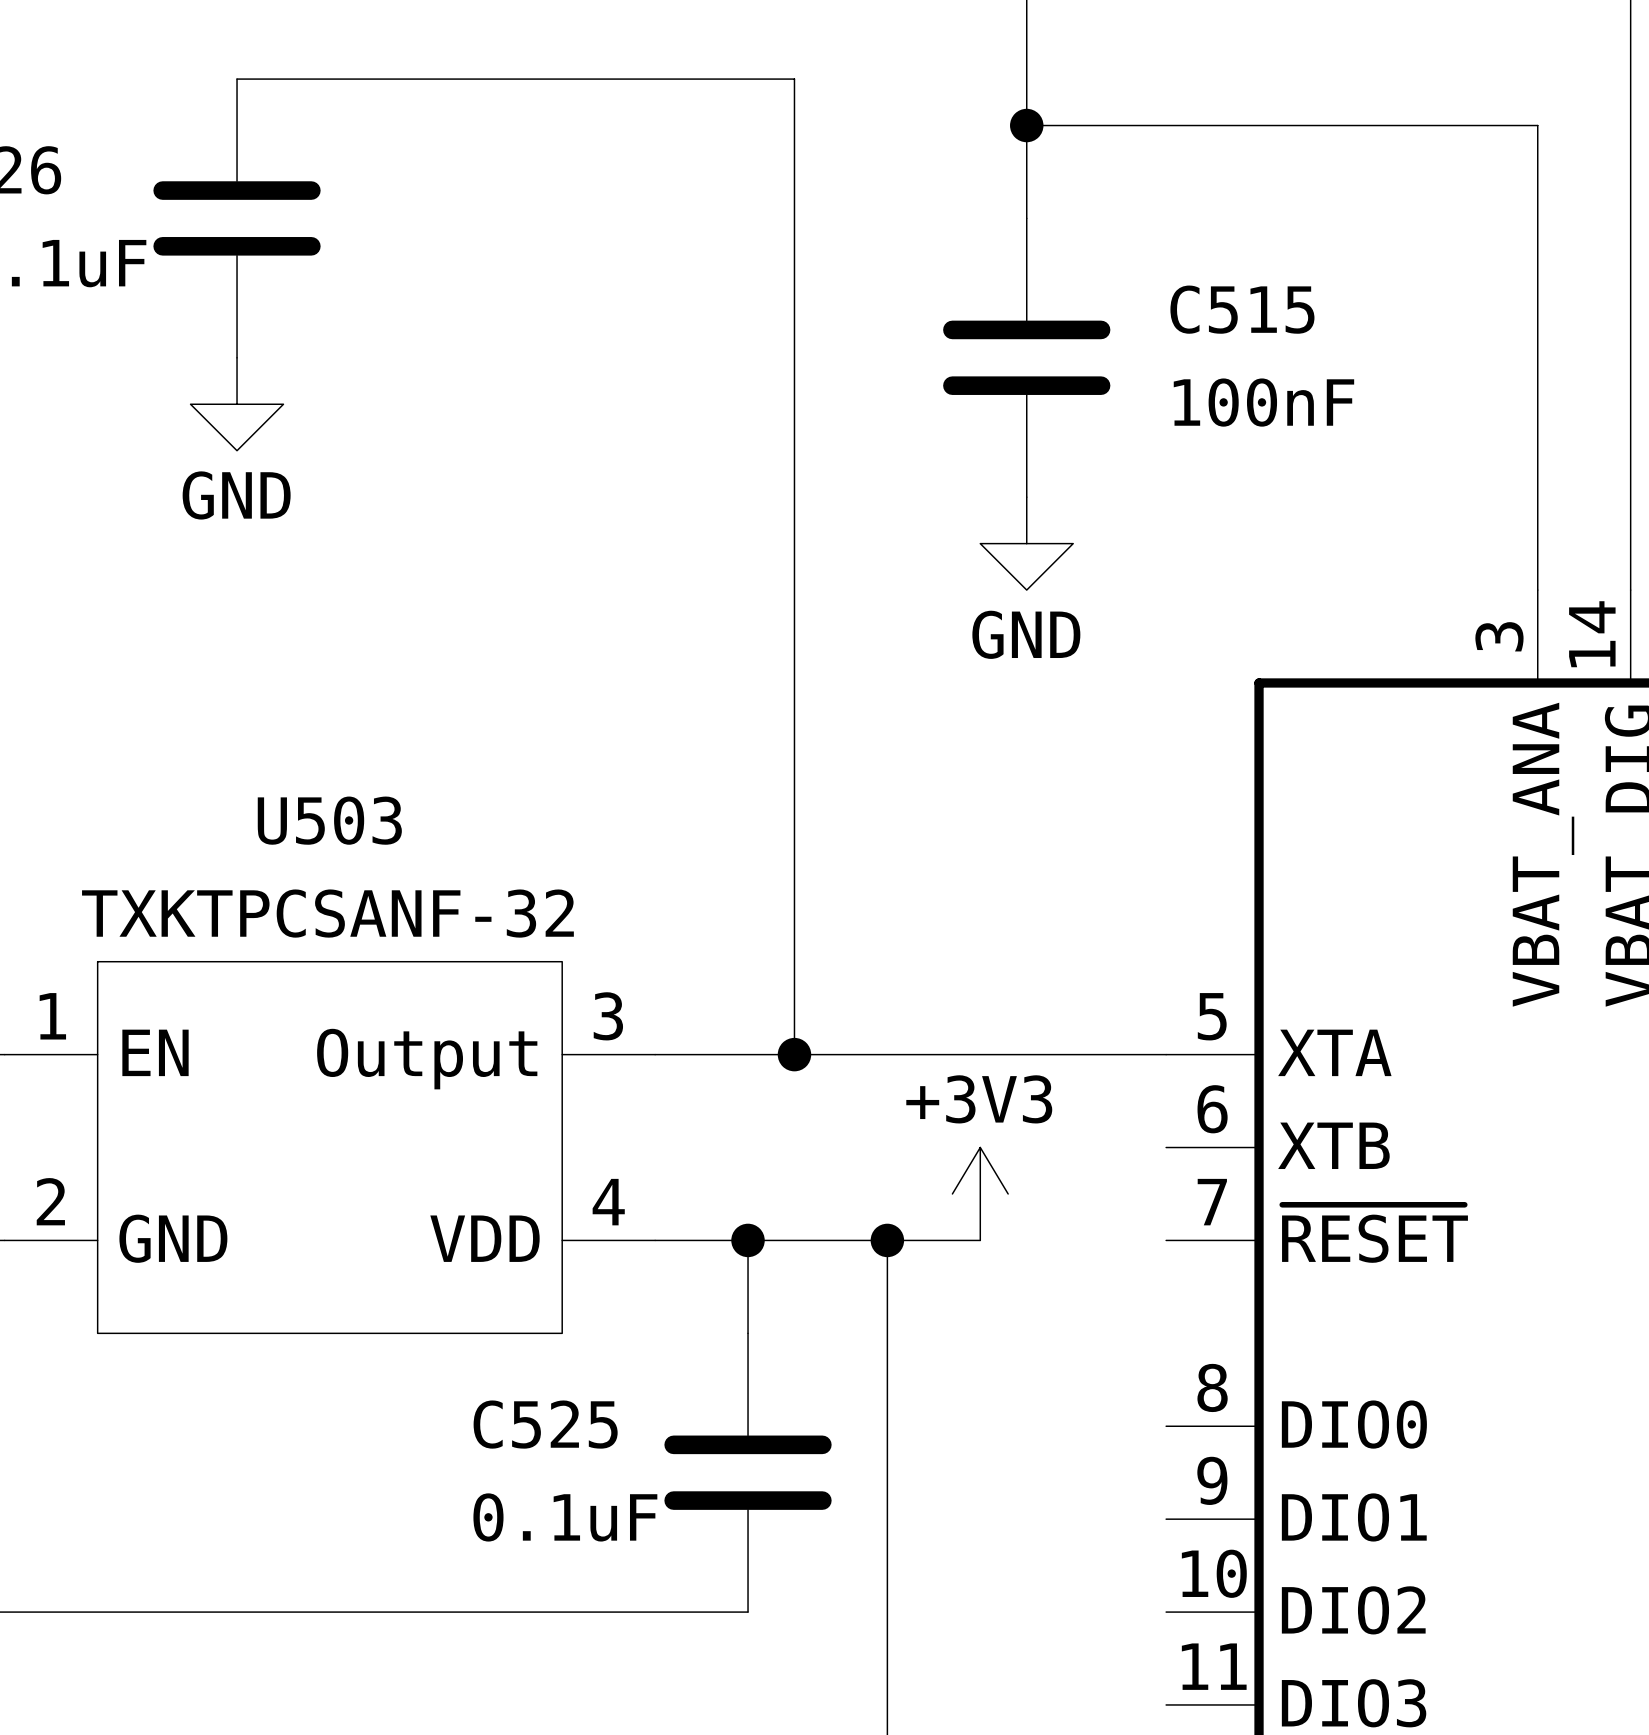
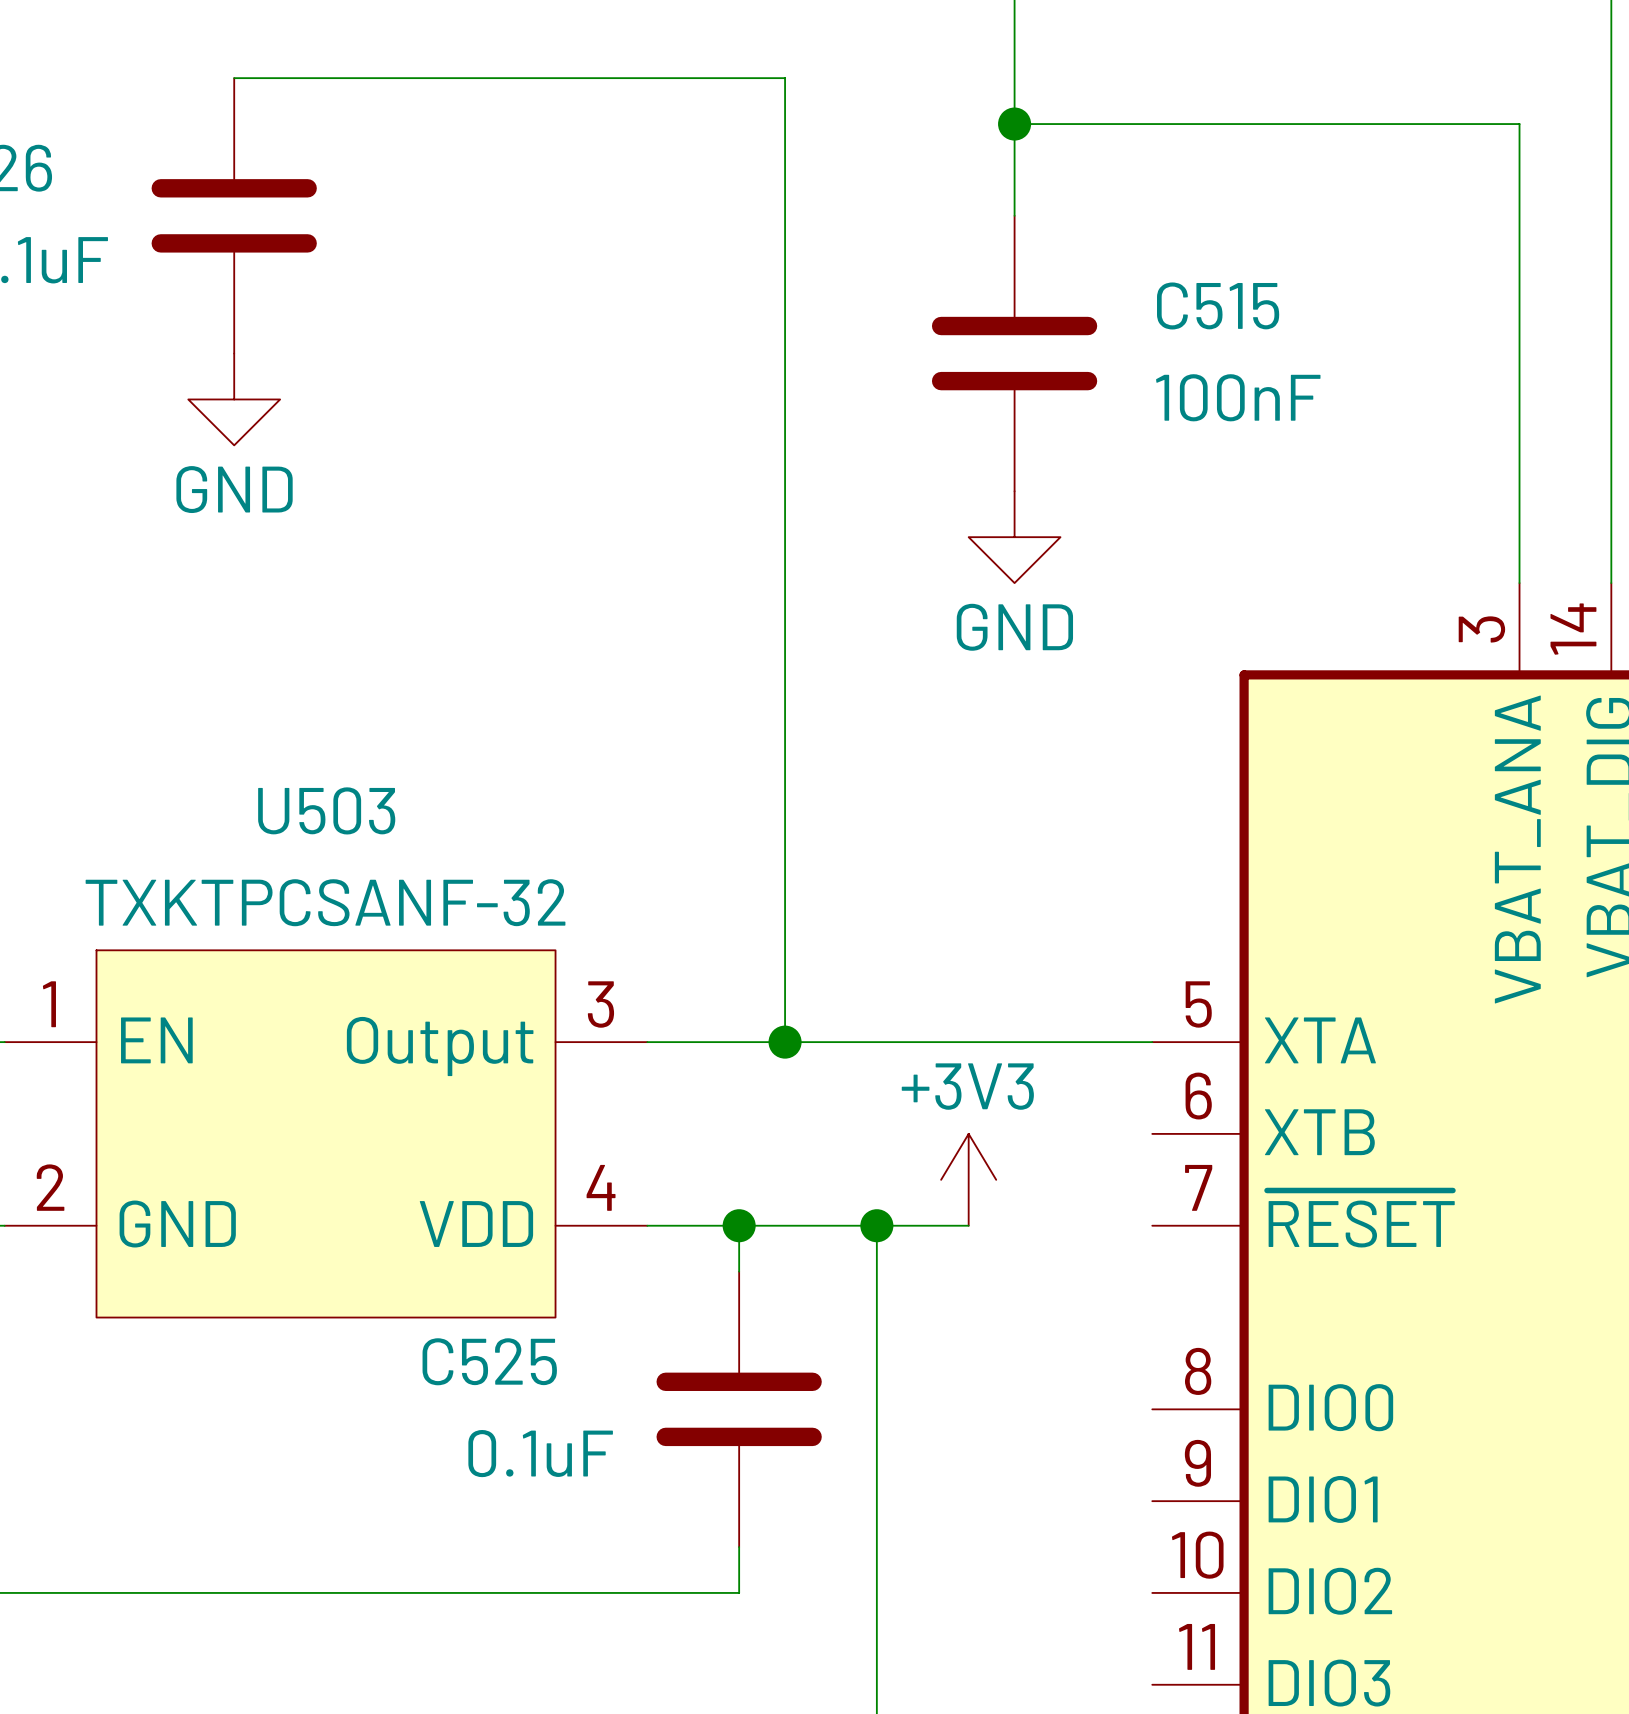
C525 name position: C525 (545, 1424) -> C525 (489, 1361)
C525 position: (748, 1472) -> (739, 1409)

